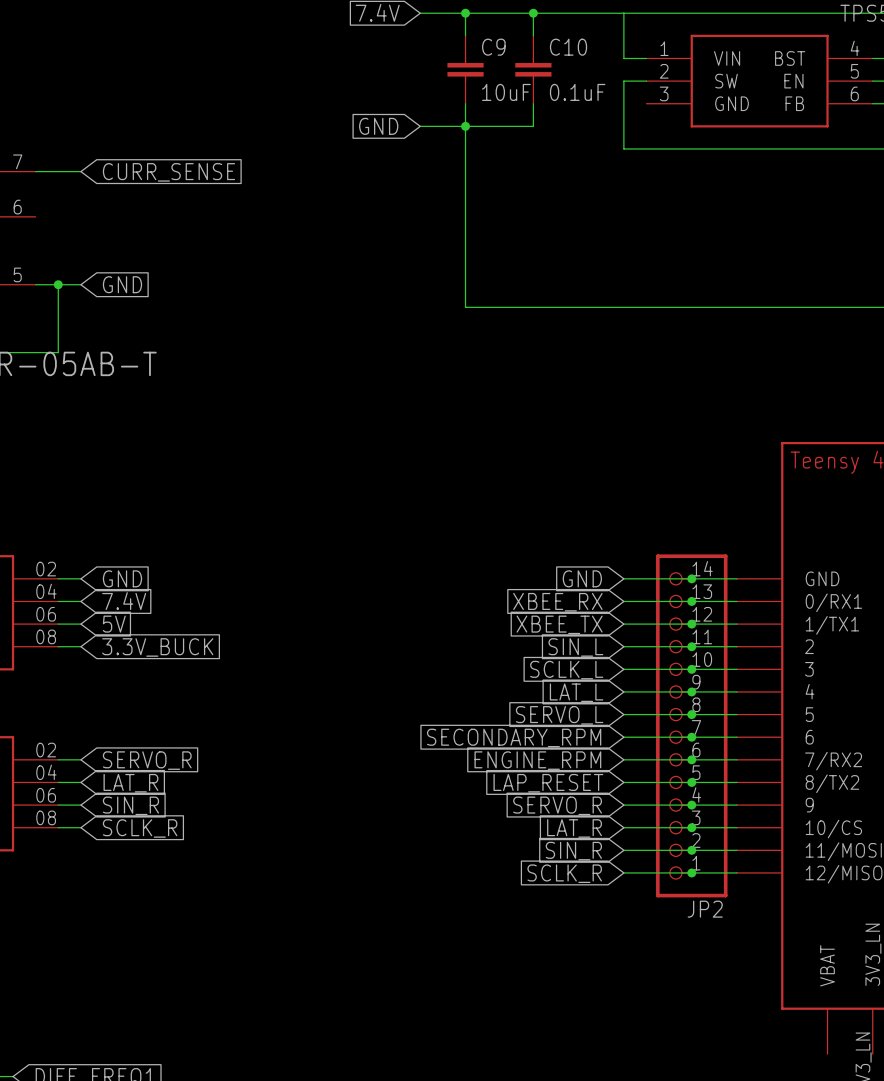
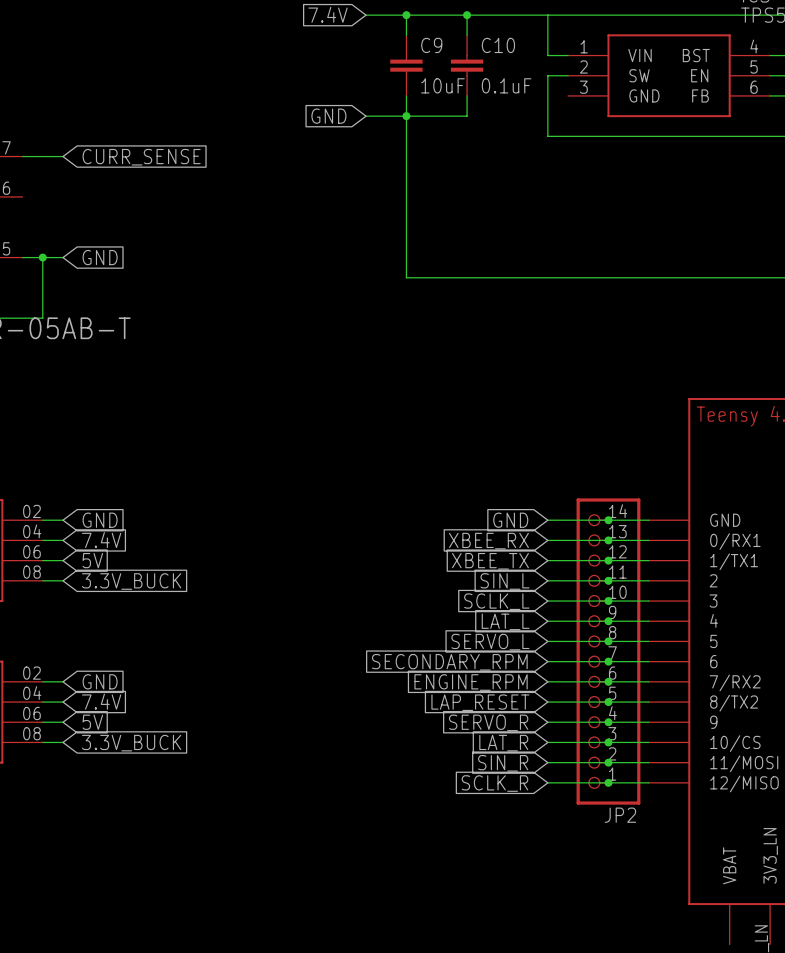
global label: SERVO_R (147, 760) -> GND (100, 681)
global label: LAT_R (130, 783) -> 7.4V (101, 701)
global label: SIN_R (130, 805) -> 5V (92, 722)
global label: SCLK_R (140, 828) -> 3.3V_BUCK (131, 743)

